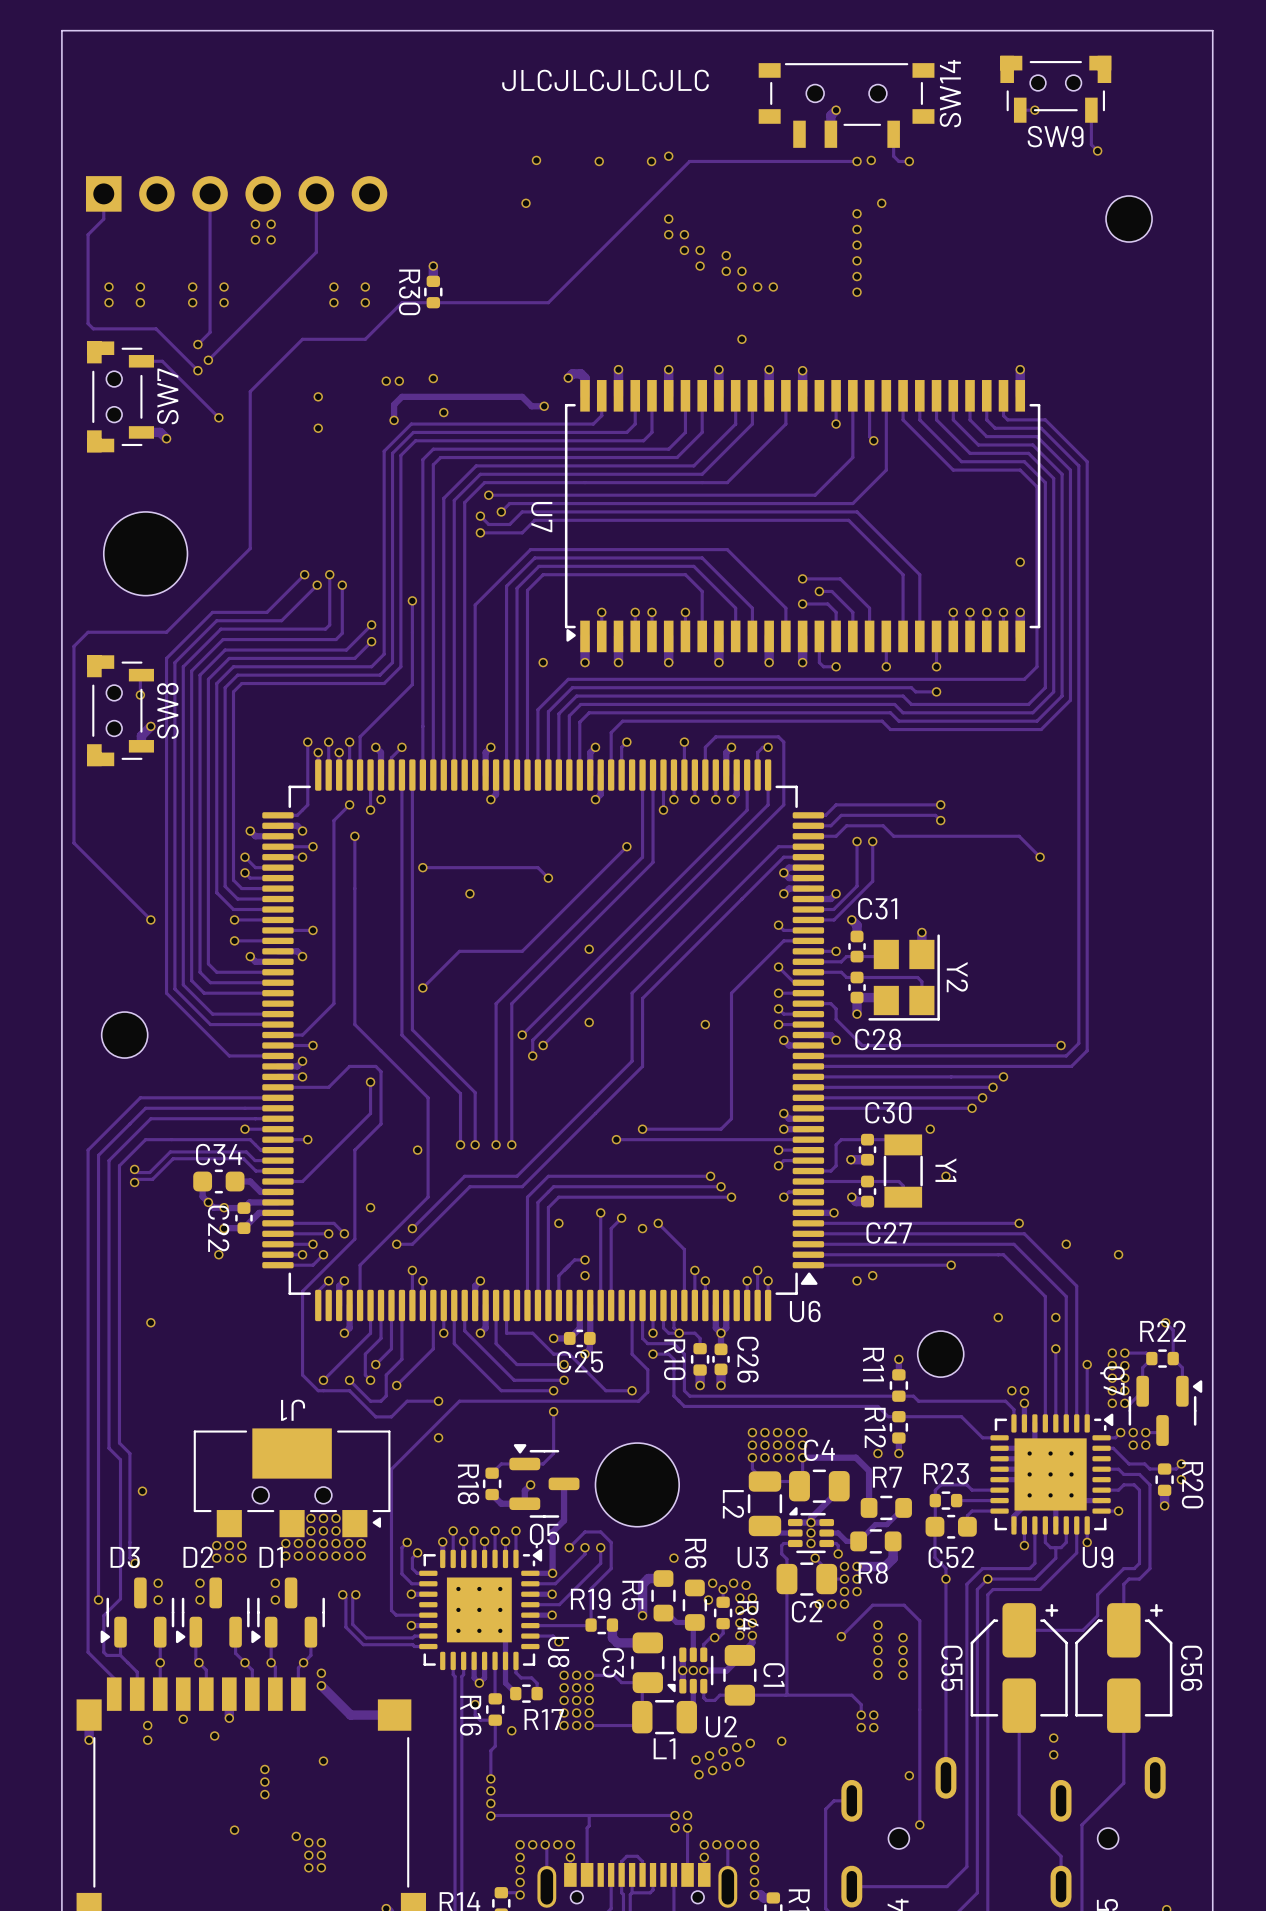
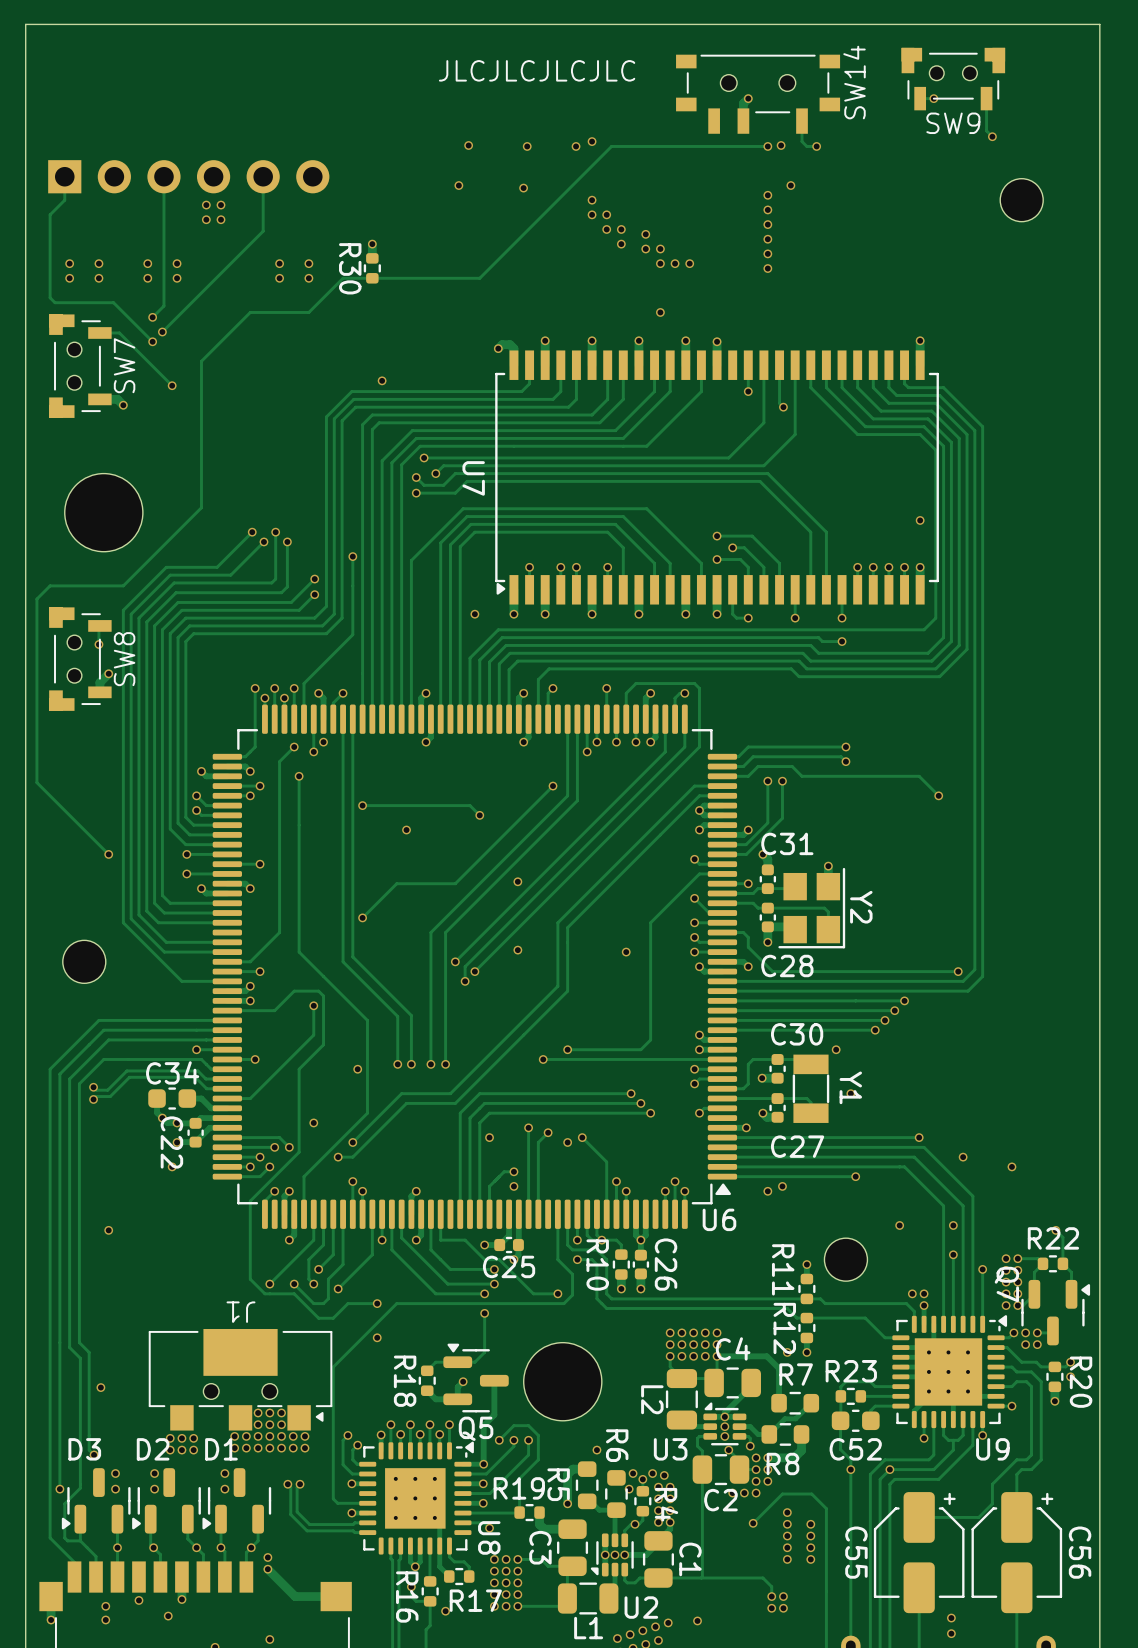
via: none -> (523, 188)
via: (433, 378) -> none
via: (386, 381) -> none
via: (399, 381) -> none
via: (318, 396) -> none
track: (544, 406) (531, 406) (522, 396) (401, 396) (394, 404) (394, 420) -> none
via: (544, 406) -> none
via: (394, 420) -> none
via: (318, 428) -> none

